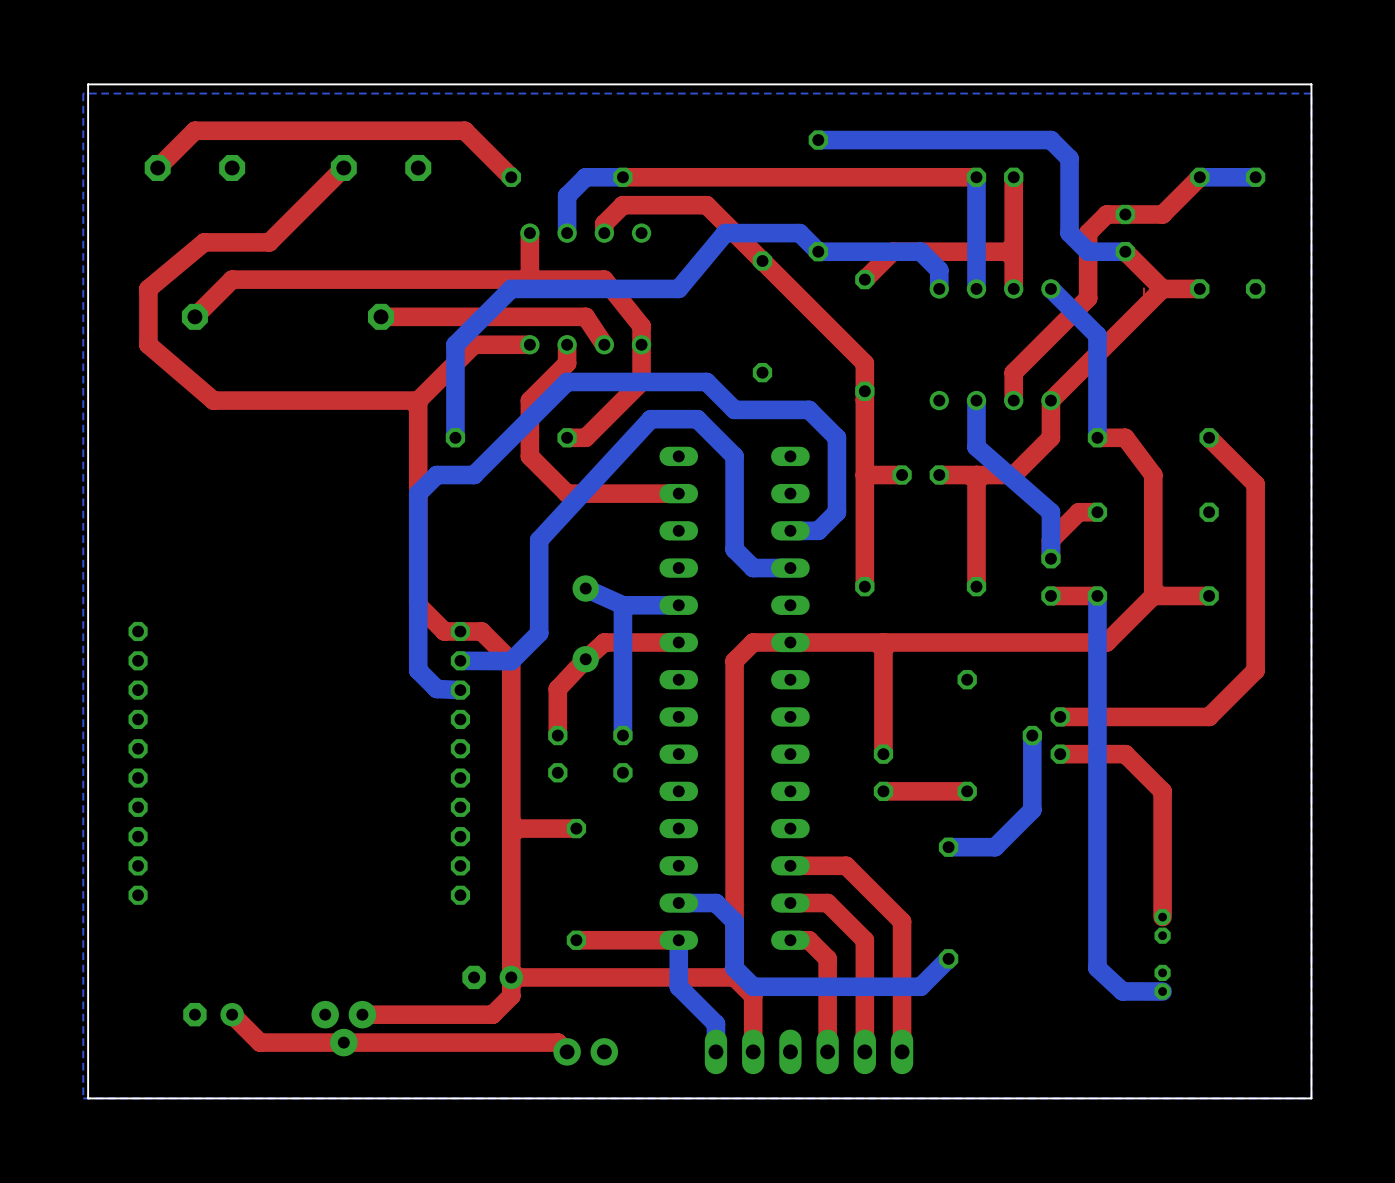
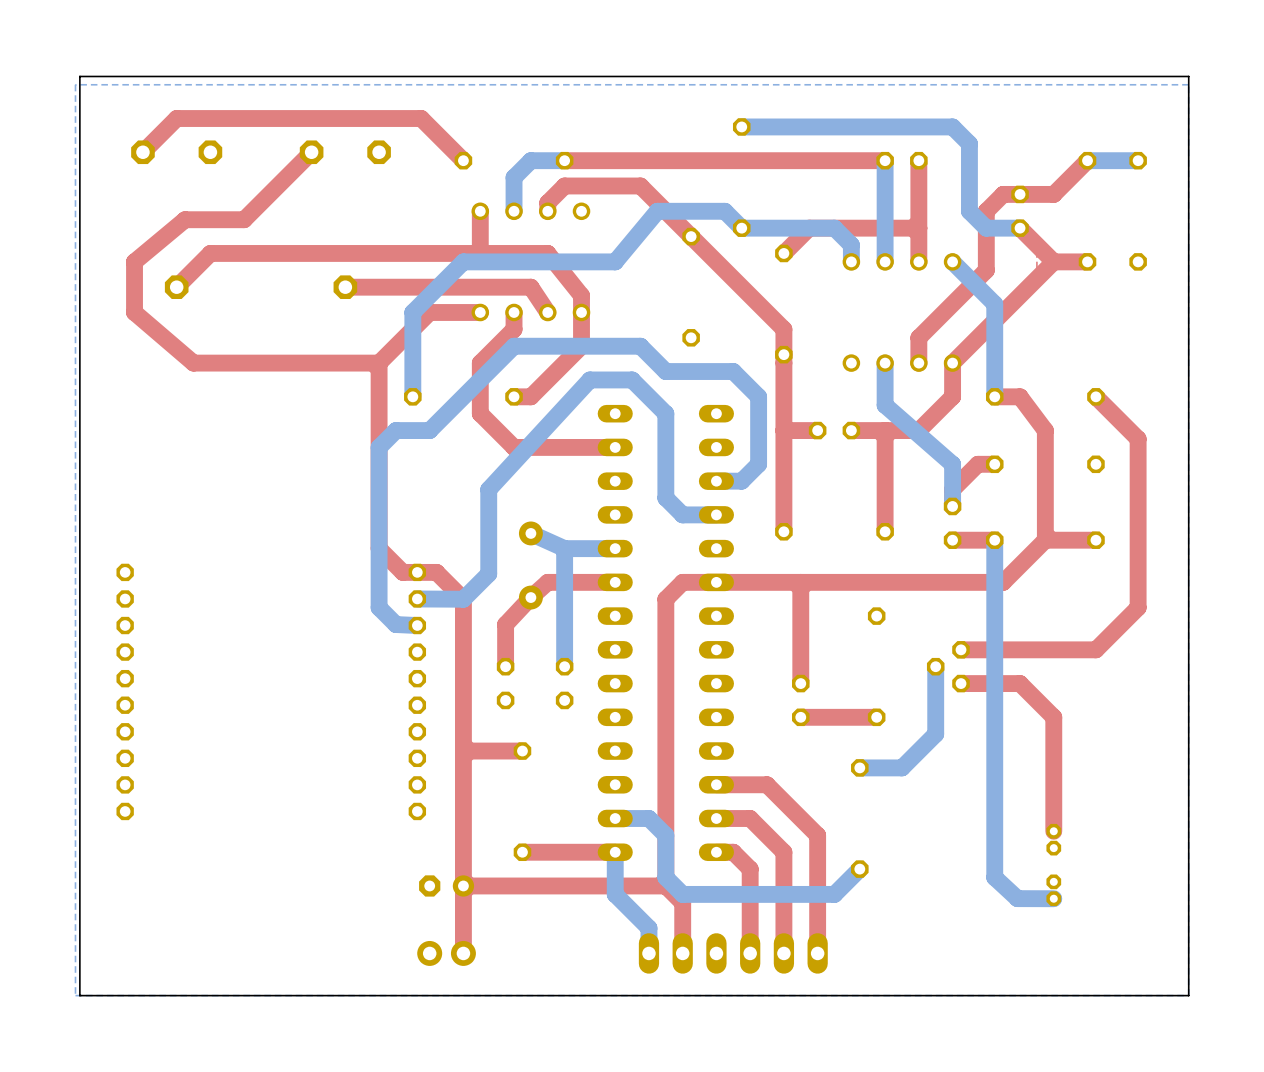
top track: (511, 996) (492, 1014) (362, 1014) -> (463, 902) (463, 953)
part: (213, 1014) -> none
top track: (232, 1014) (260, 1042) (557, 1042) (567, 1051) -> none
part: (343, 1028) -> none
part position: (585, 1051) -> (446, 953)

